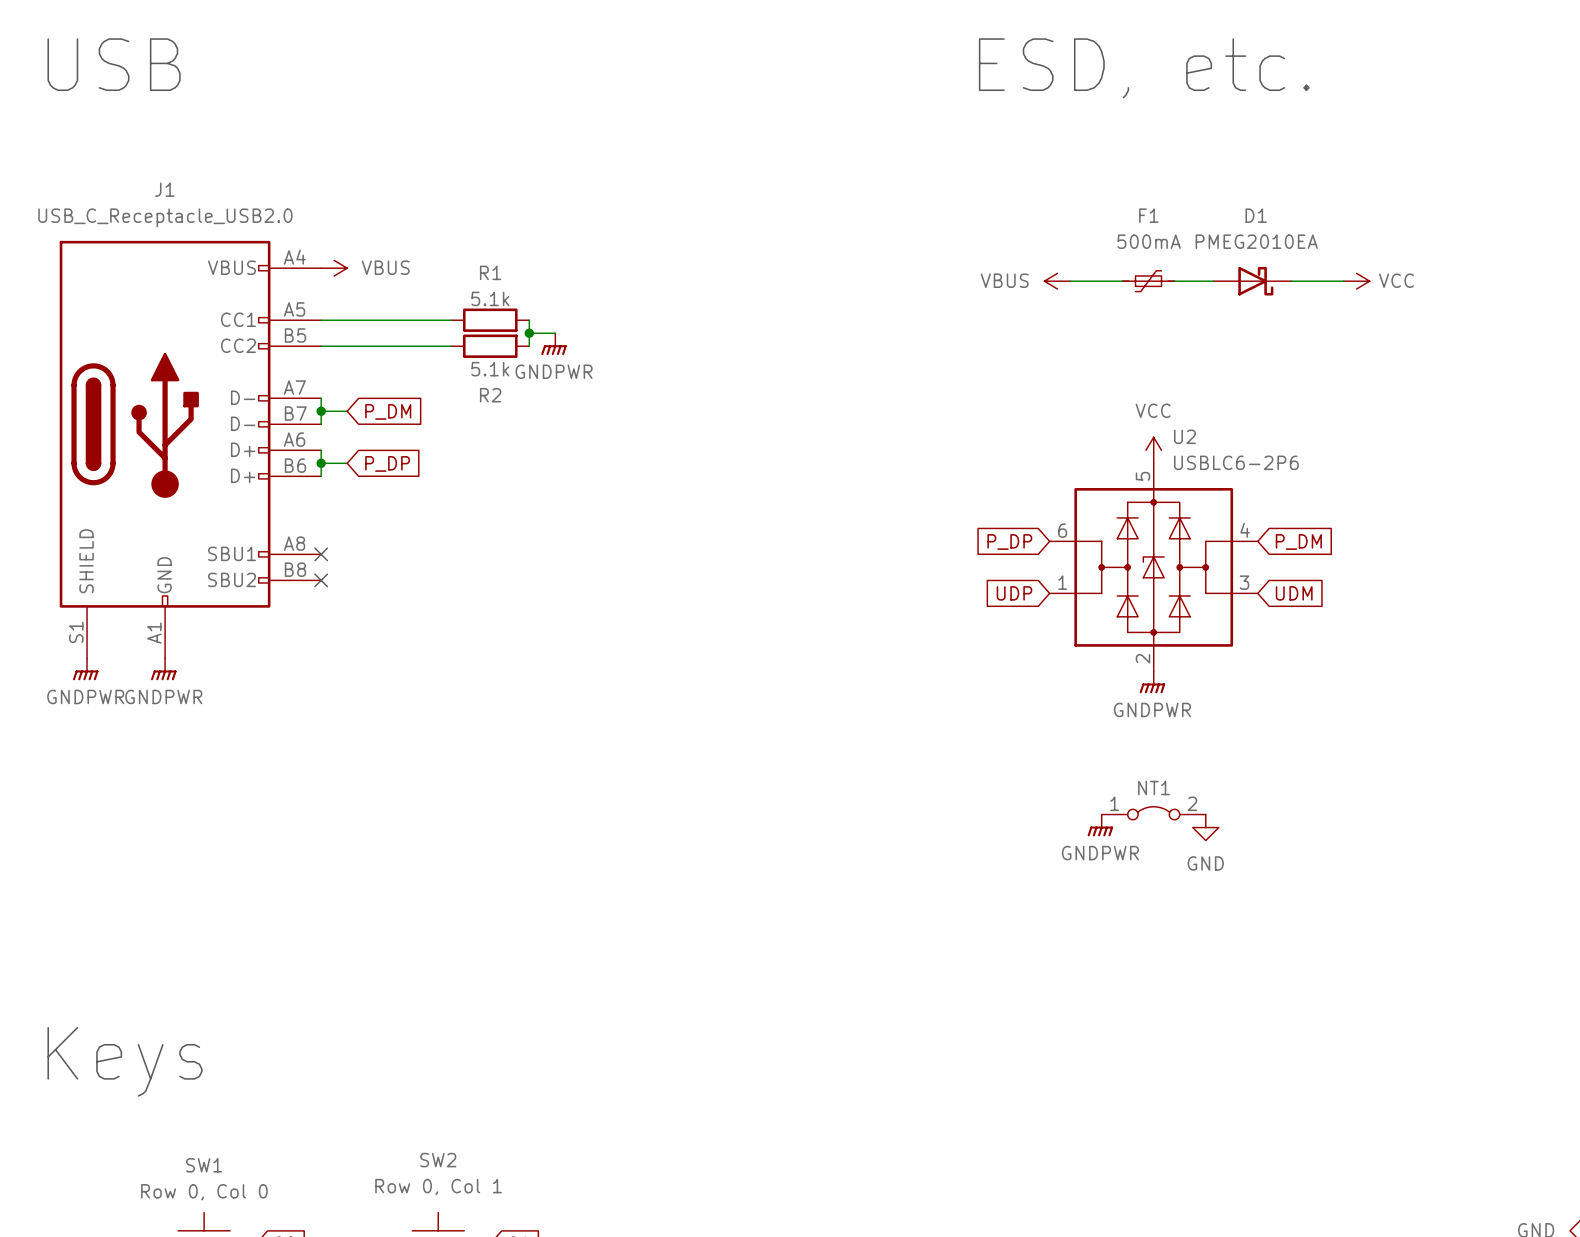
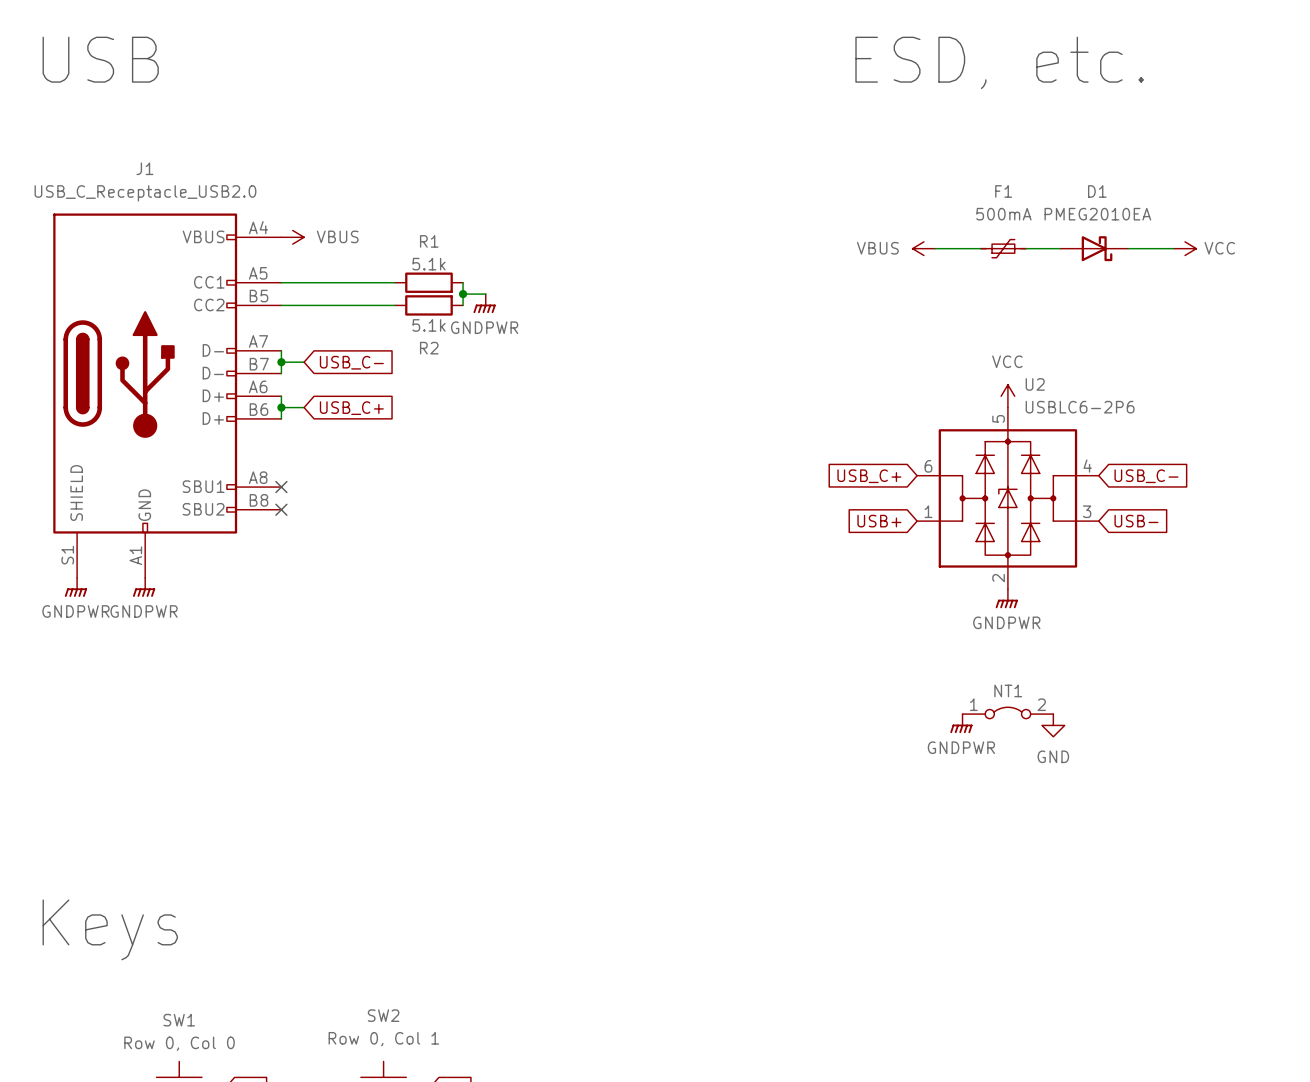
global label: P_DM (388, 411) -> USB_C- (351, 362)
global label: P_DP (387, 463) -> USB_C+ (351, 408)
global label: P_DP (1009, 541) -> USB_C+ (869, 476)
global label: P_DM (1298, 541) -> USB_C- (1146, 476)
global label: UDP (1014, 593) -> USB+ (879, 521)
global label: UDM (1294, 593) -> USB- (1136, 521)

